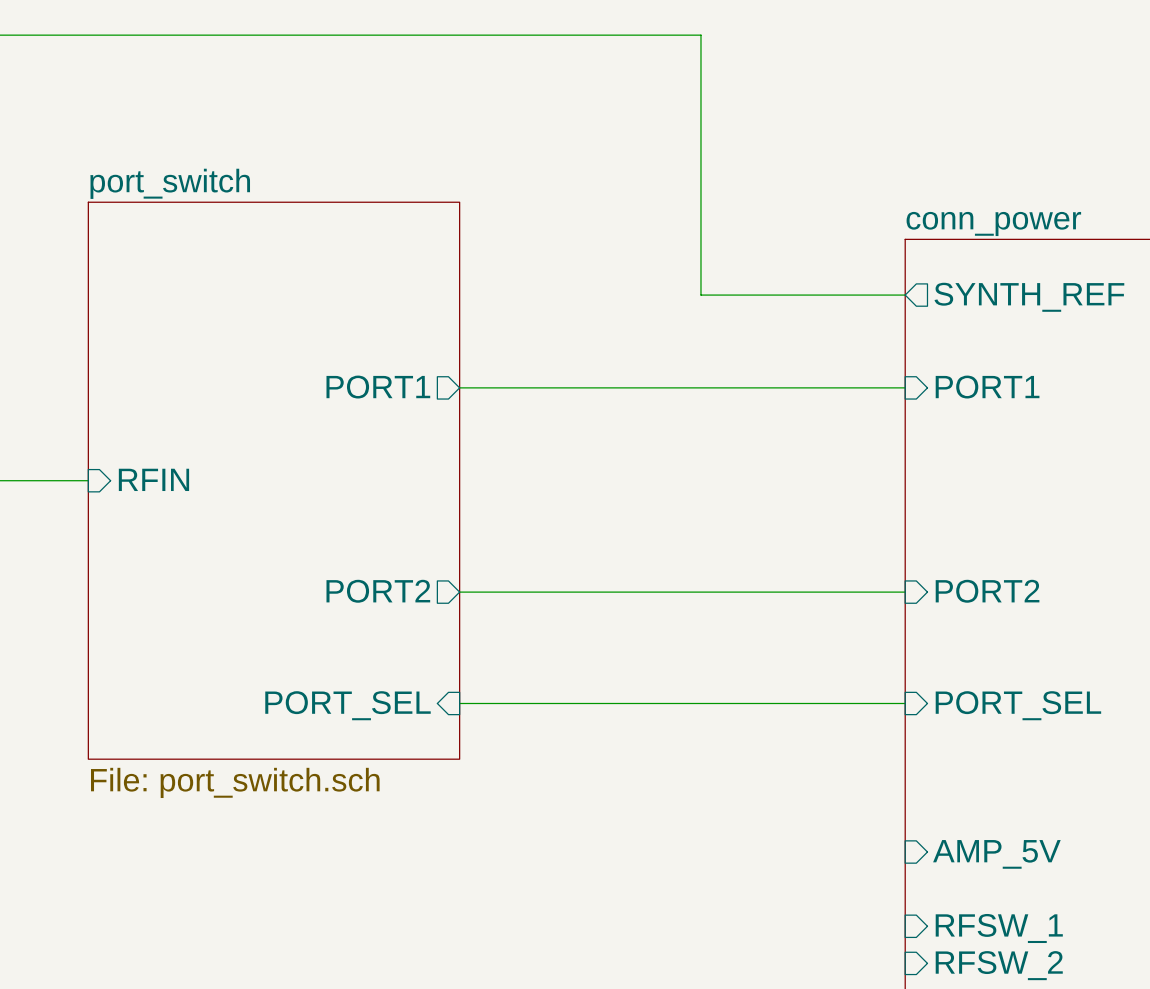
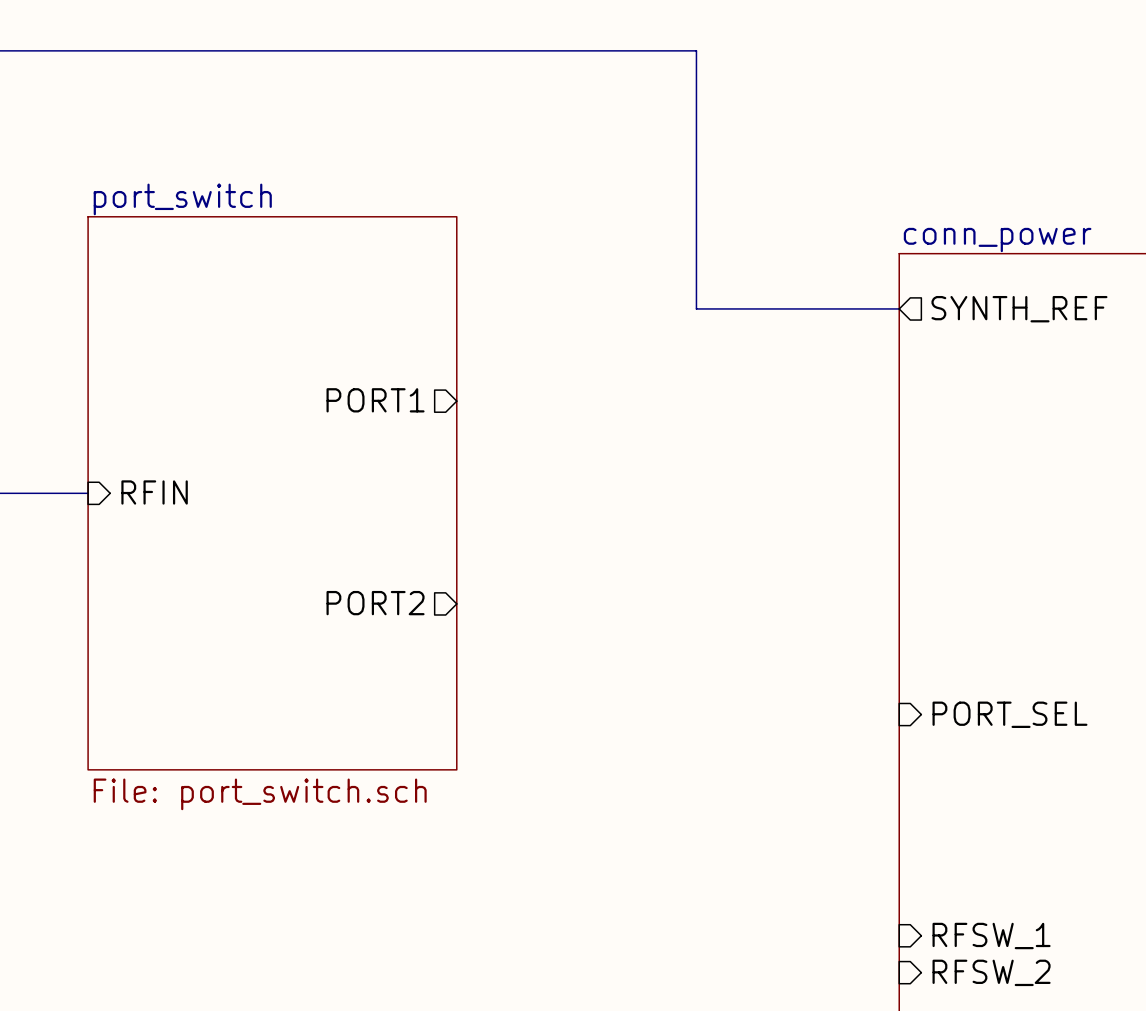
wire: (459, 387) (905, 387) -> none
sheet pin: PORT1 (987, 387) -> none
sheet pin: PORT2 (987, 591) -> none
wire: (459, 592) (905, 592) -> none
wire: (459, 703) (905, 703) -> none
sheet pin: PORT_SEL (348, 705) -> none
sheet pin: AMP_5V (996, 854) -> none

